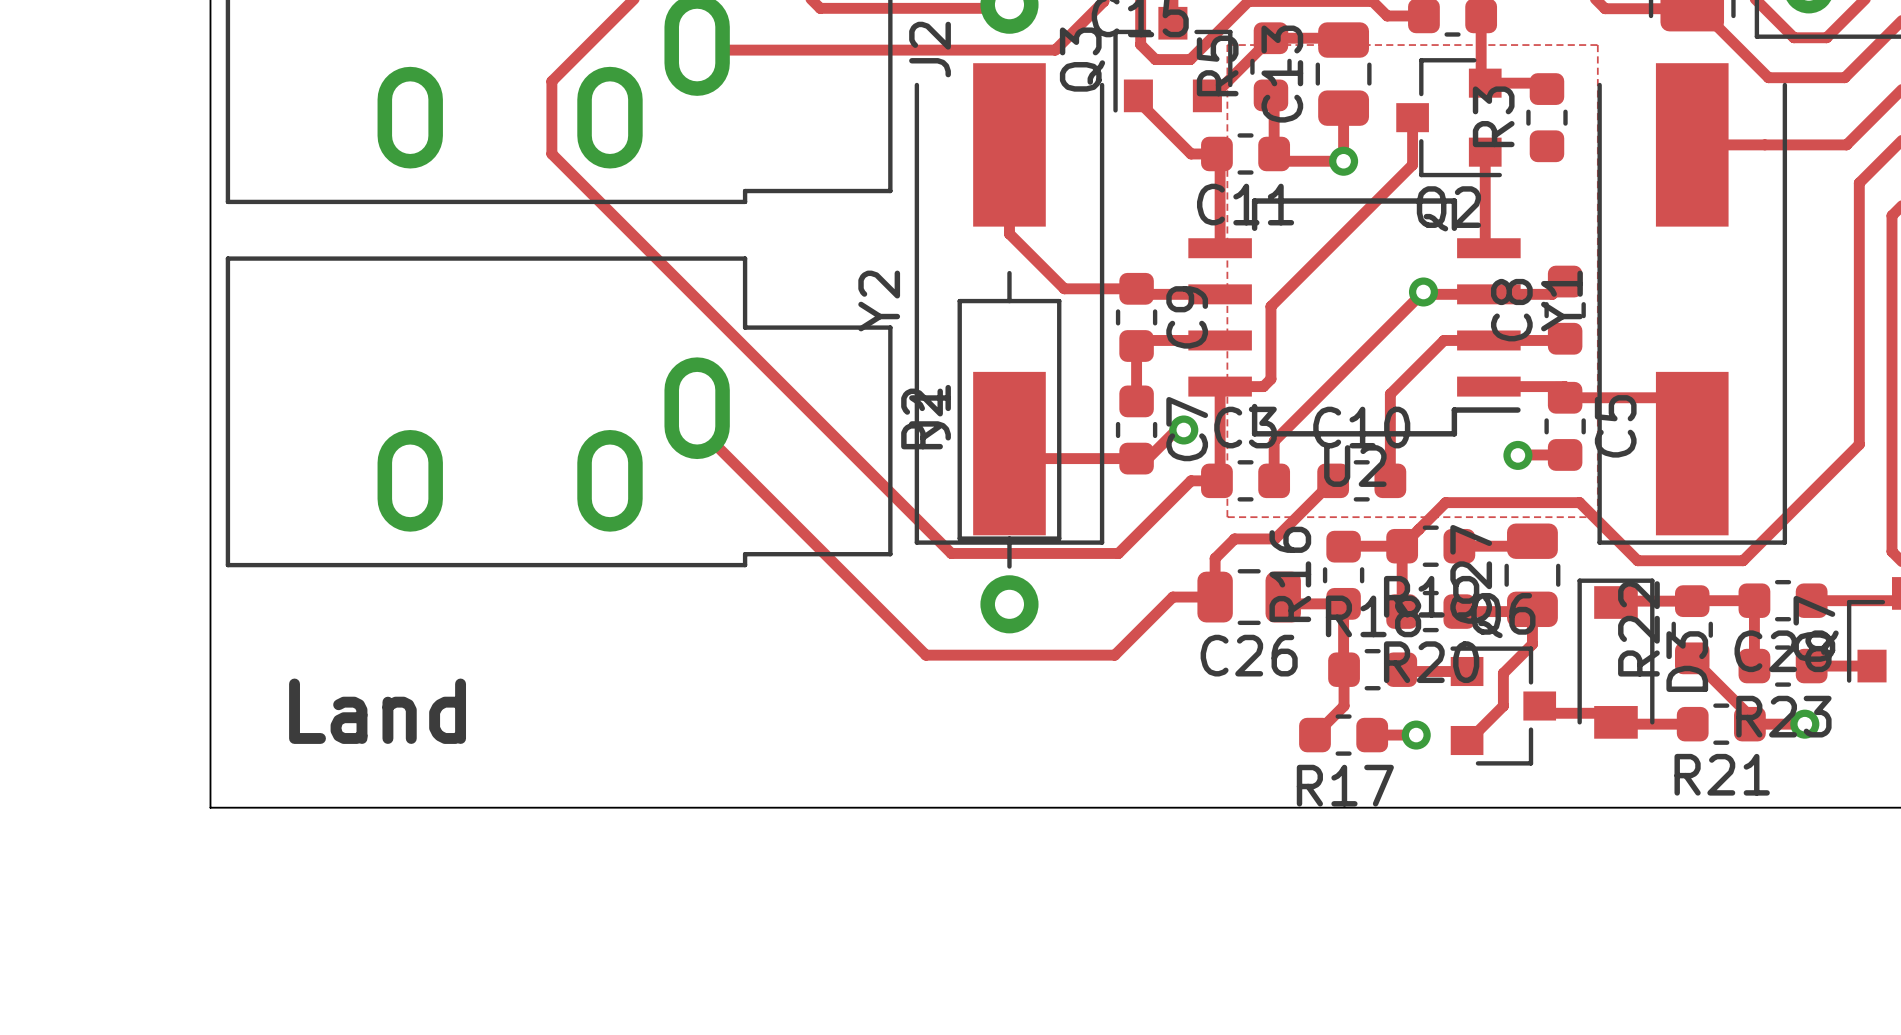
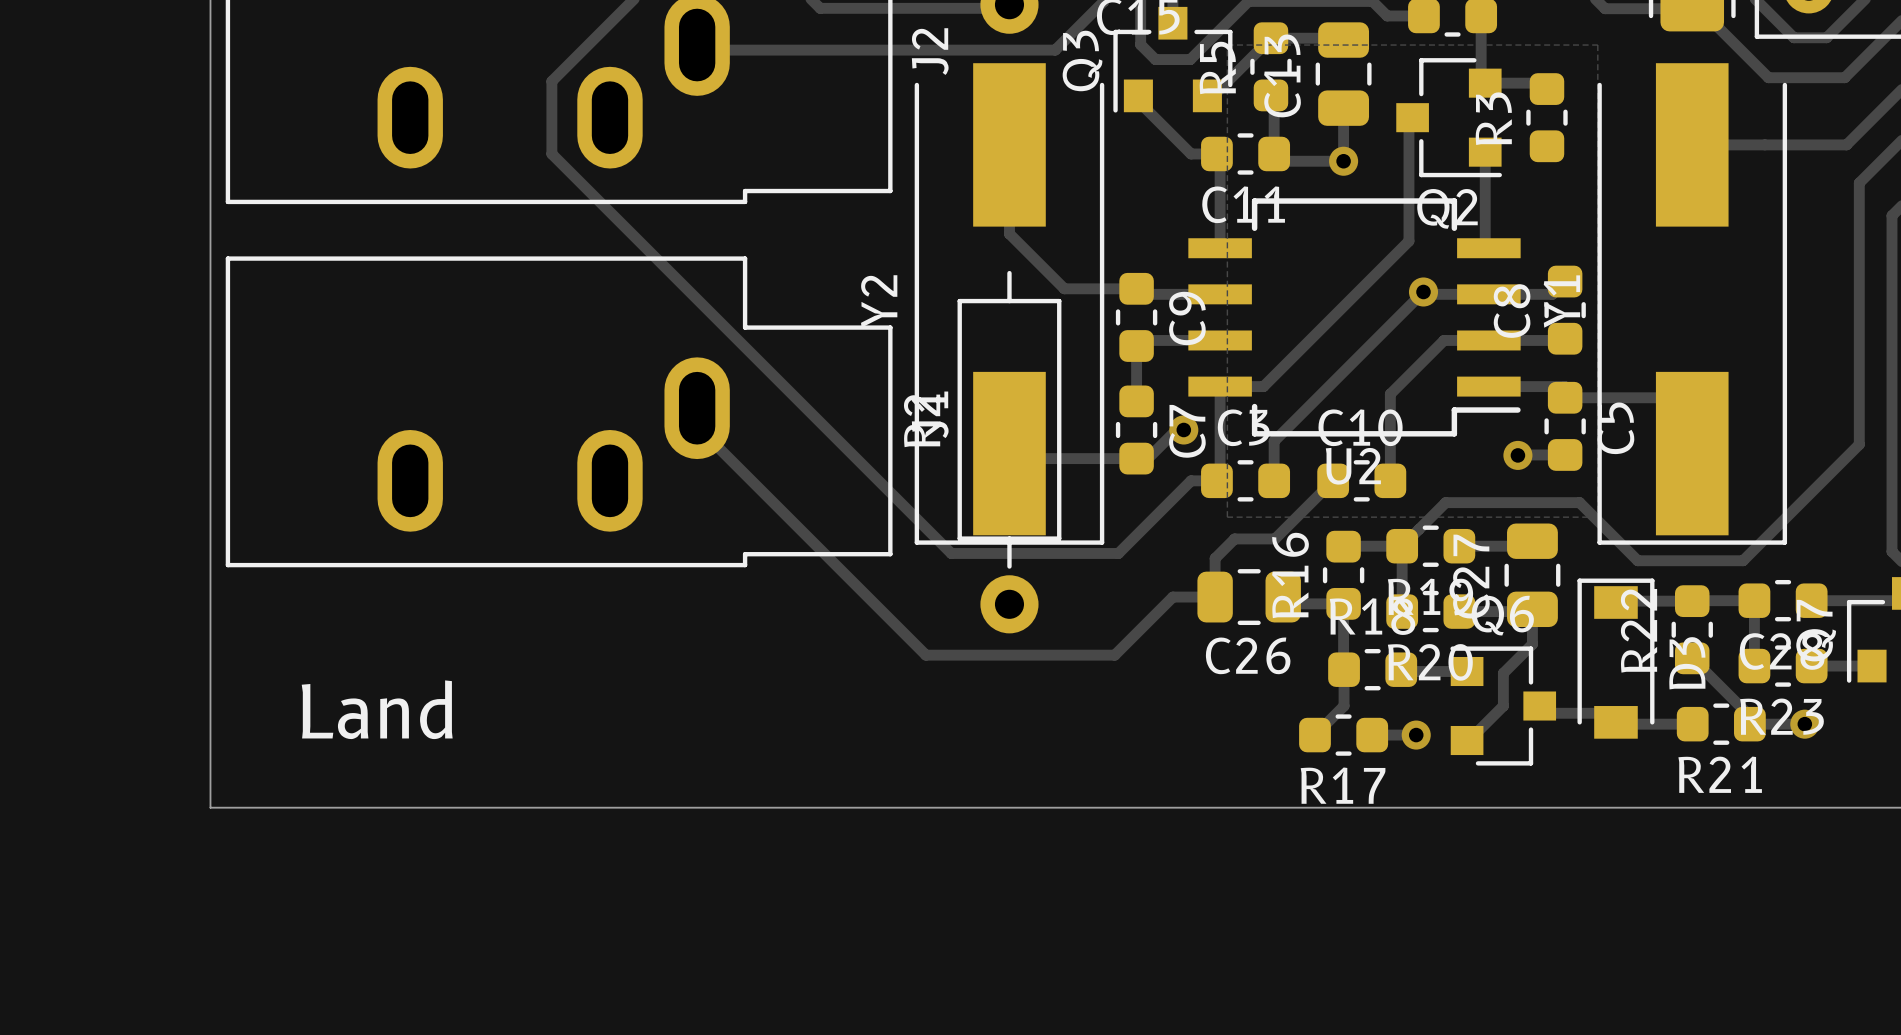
track: (1412, 117) (1412, 164) (1270, 306) (1270, 379) -> (1412, 117) (1408, 121) (1408, 241) (1270, 379)

